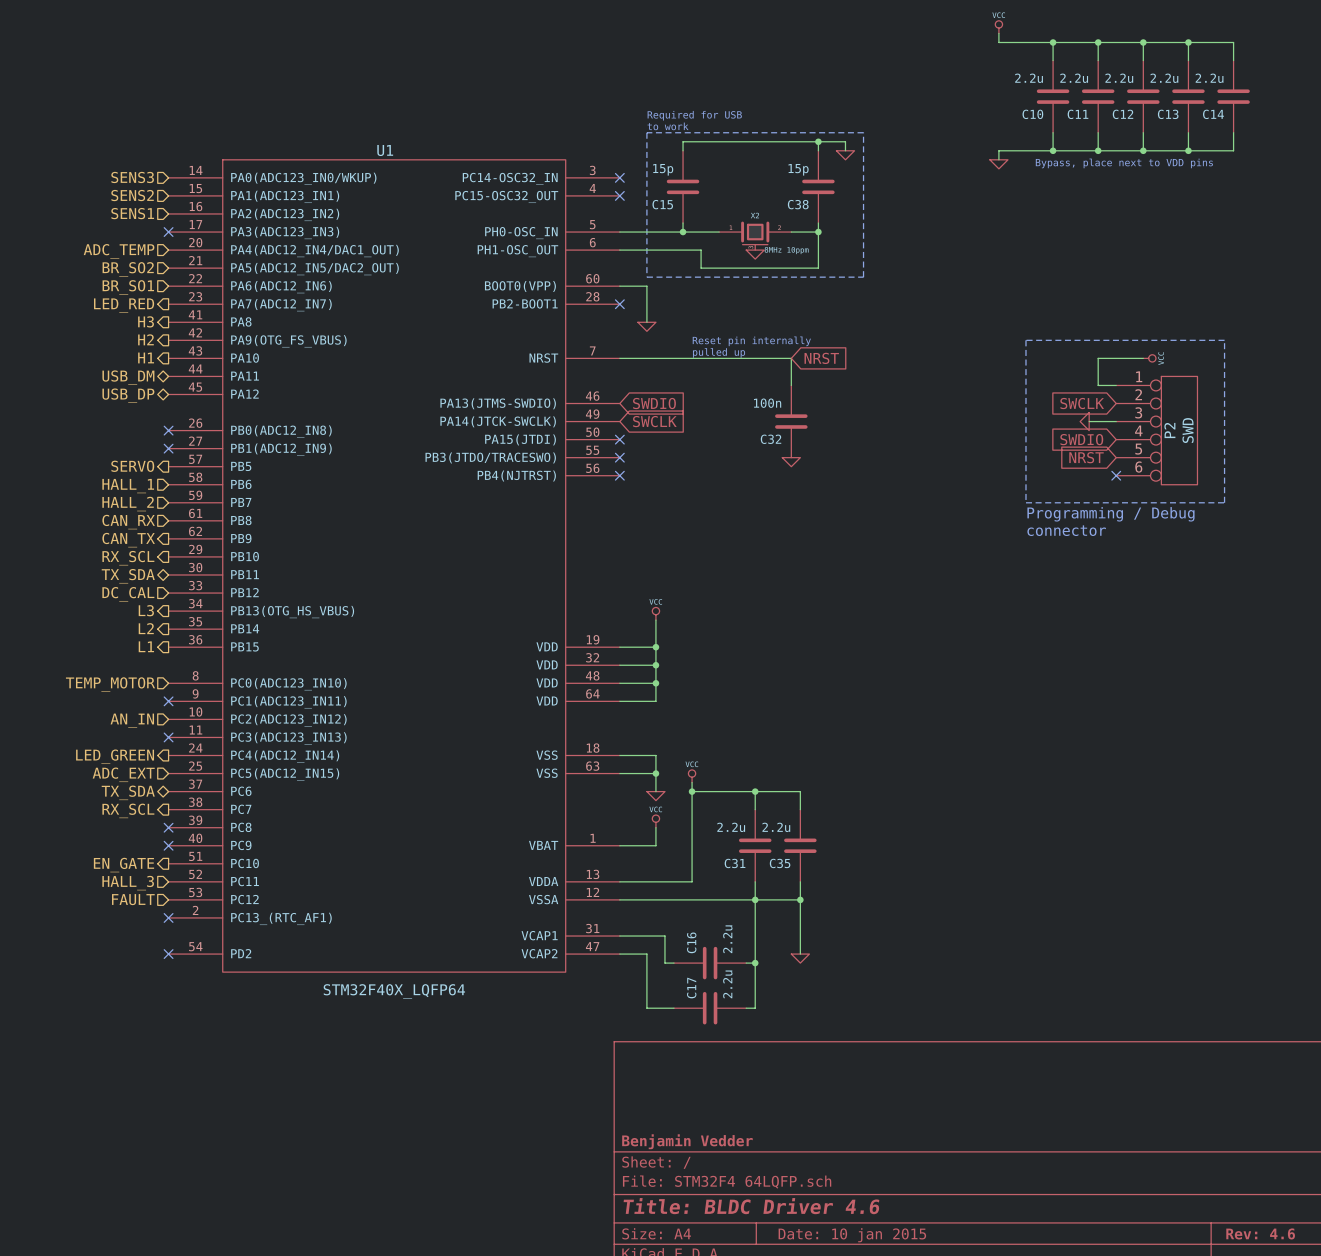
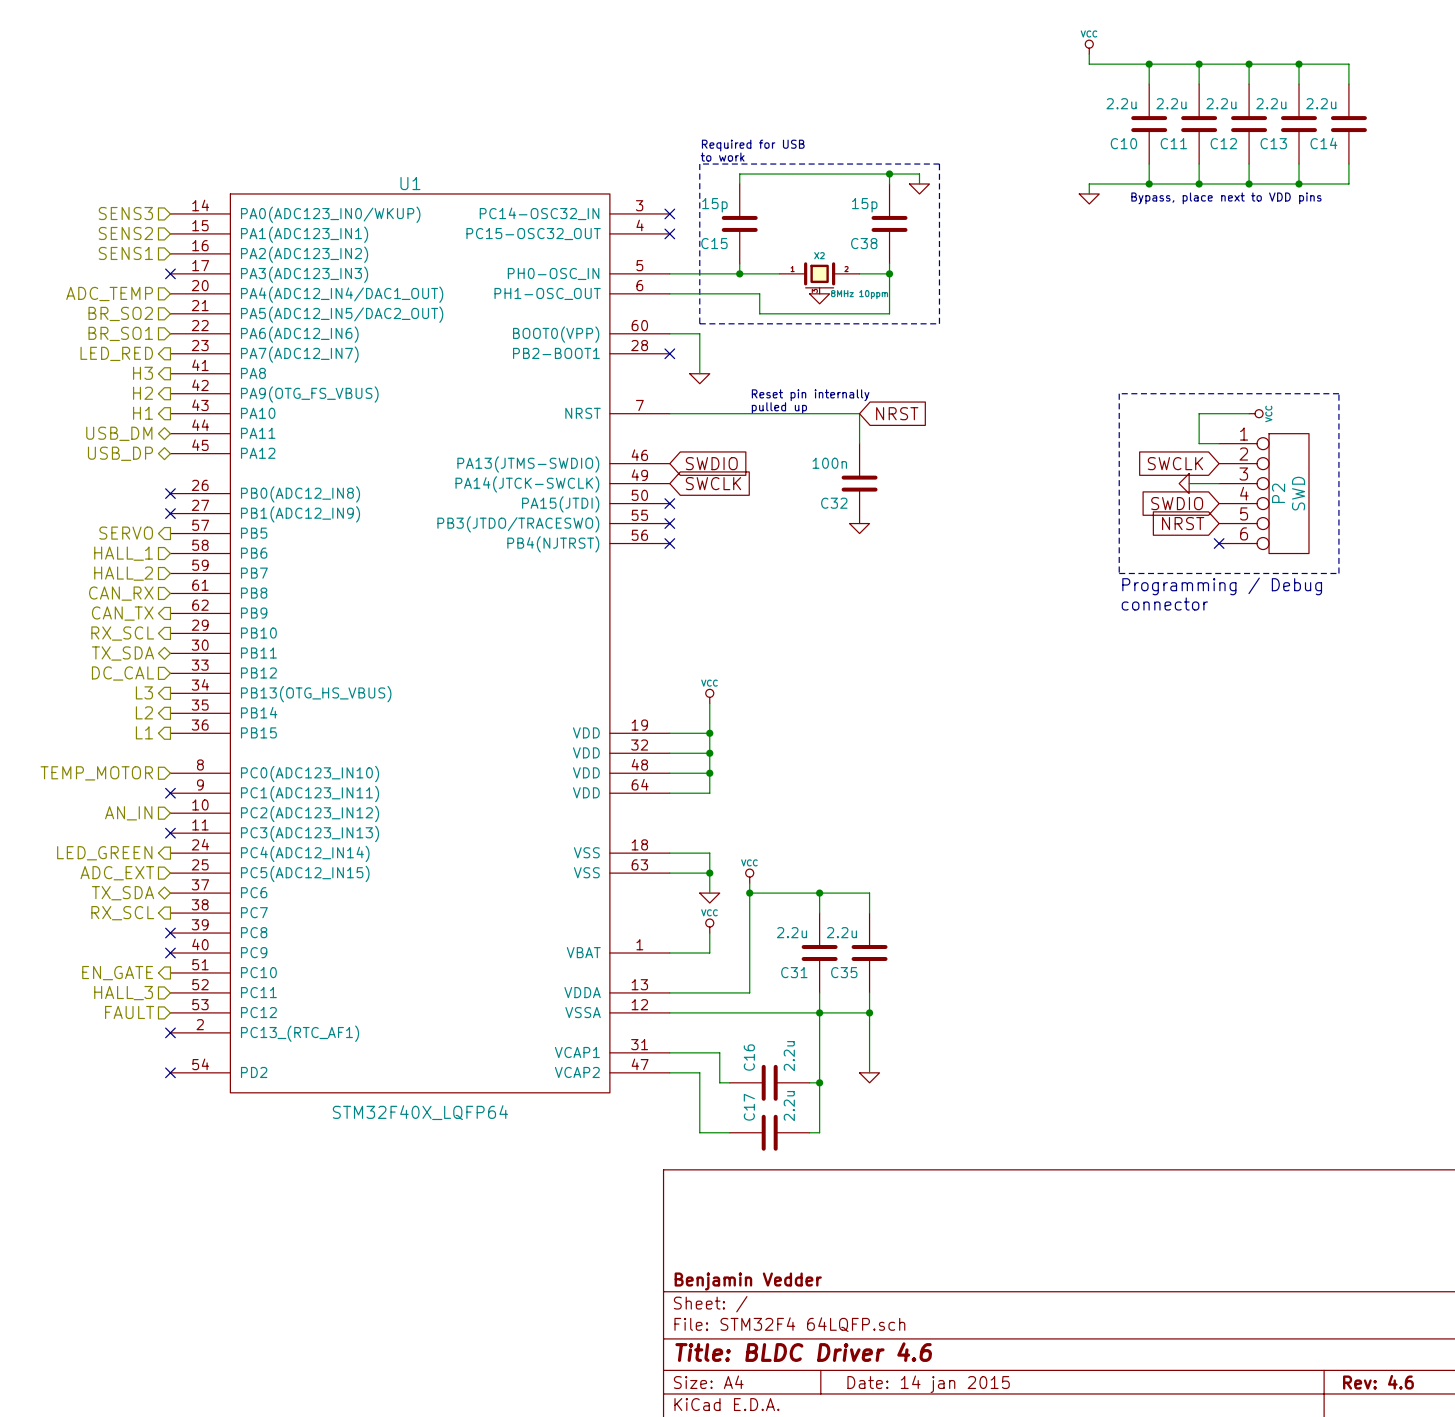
title block: Date: 10 jan 2015 (852, 1235) -> Date: 14 jan 2015 (928, 1384)

